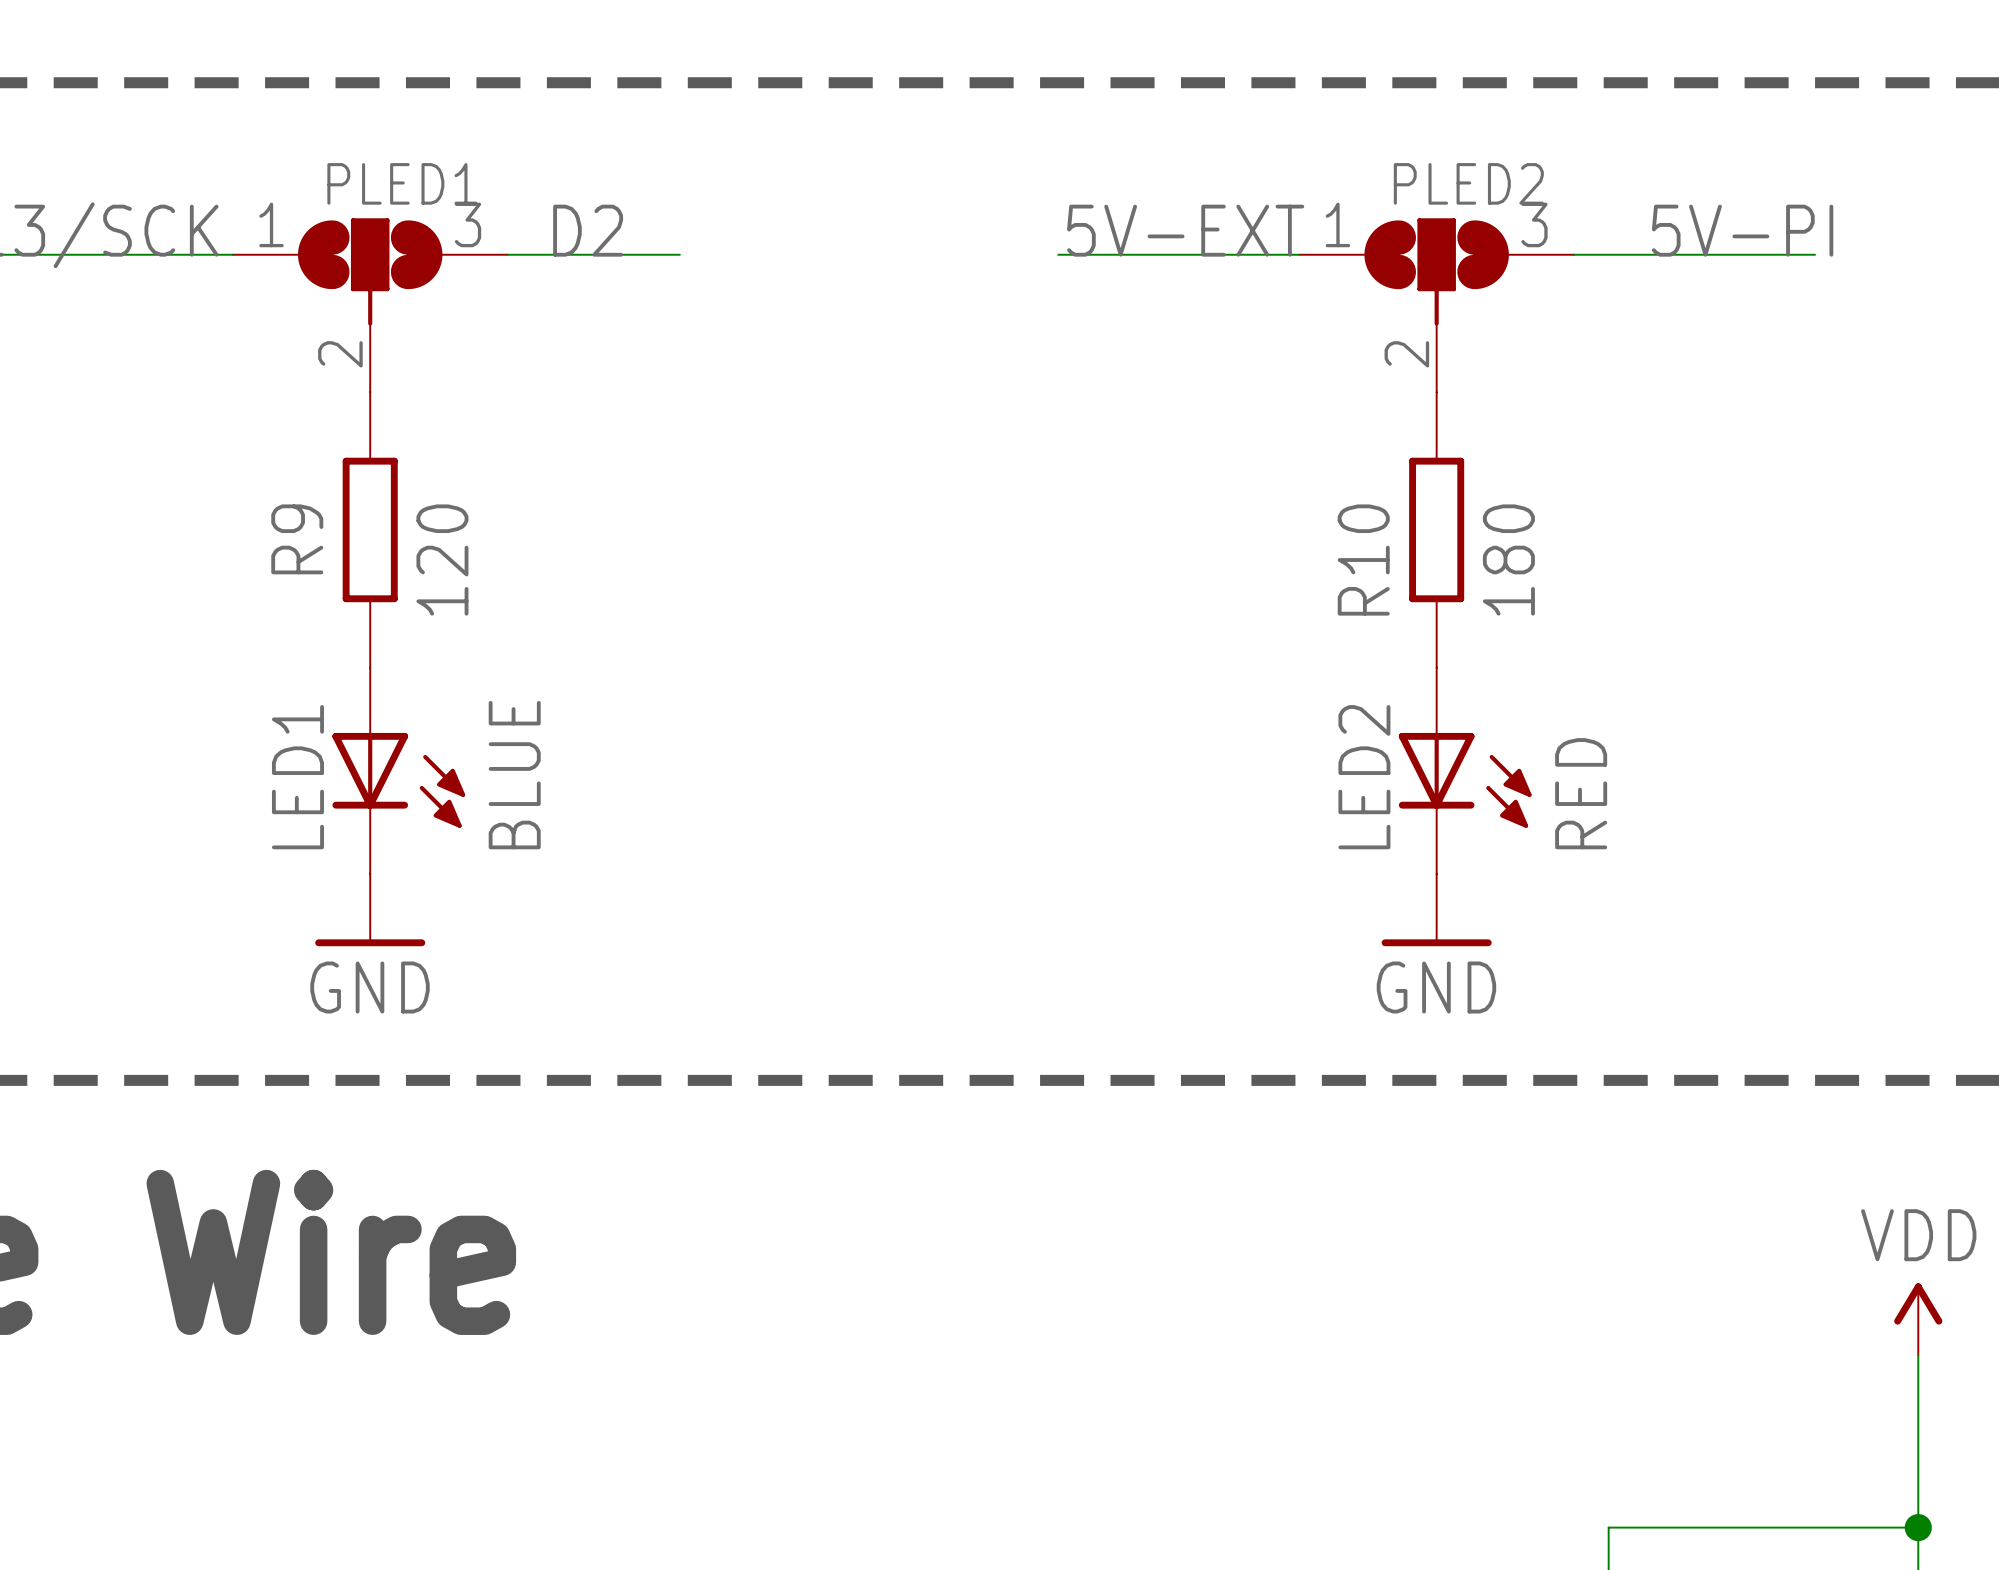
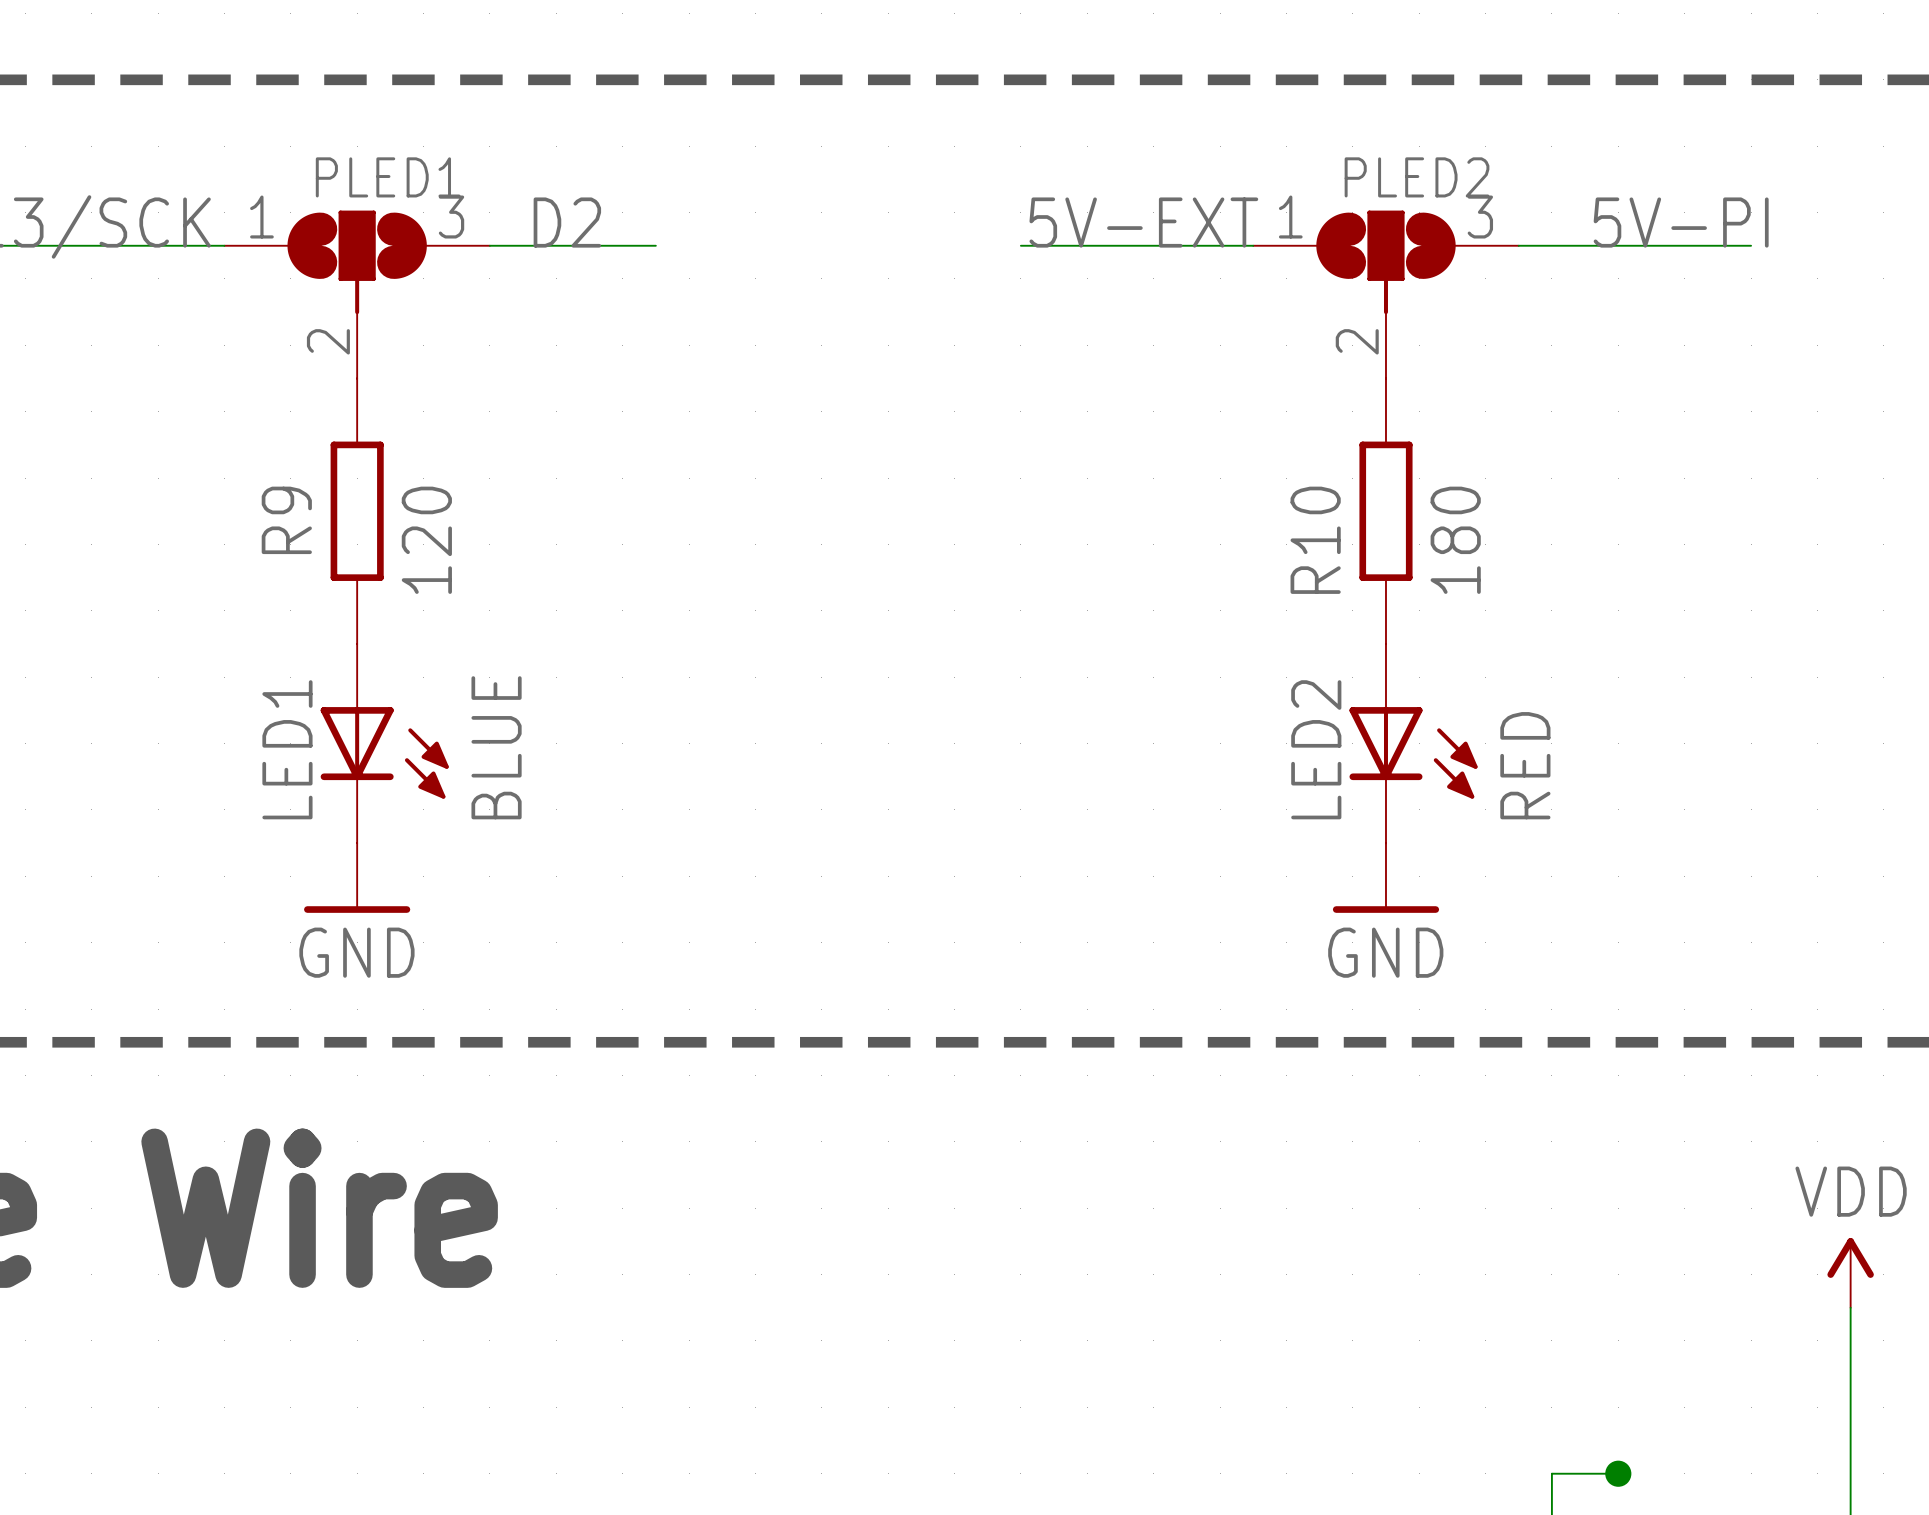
wire: (1677, 1527) (1918, 1527) -> none
junction: none -> (1618, 1473)
junction: (1918, 1527) -> none

